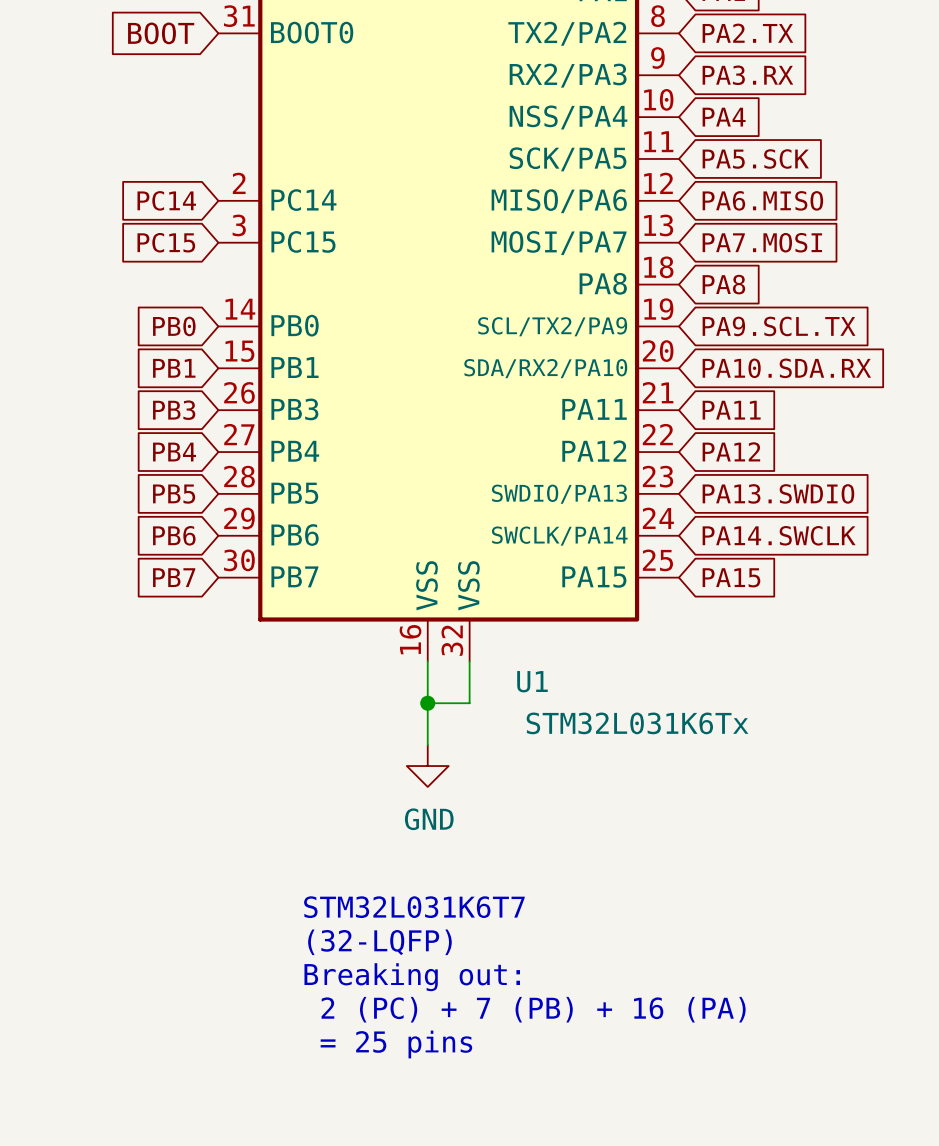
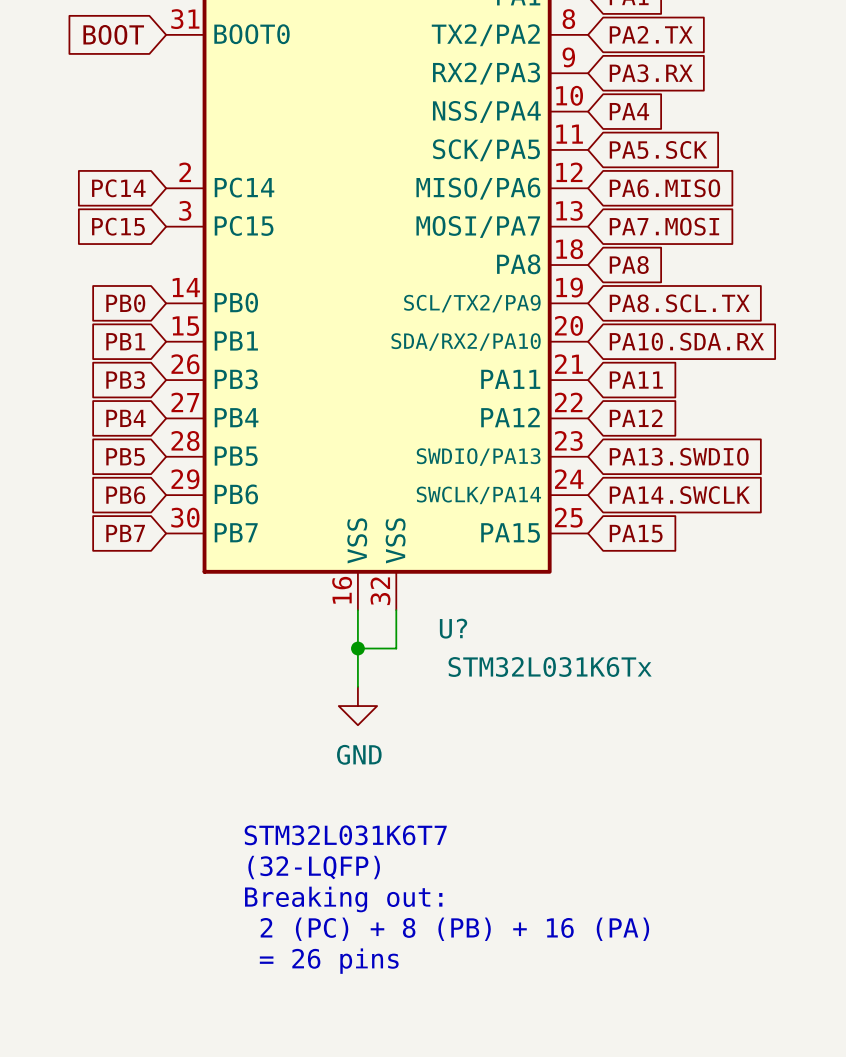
global label: PA9.SCL.TX (779, 326) -> PA8.SCL.TX (679, 303)
U1 name: U1 (532, 681) -> U? (453, 628)
text: 2 (PC) + 7 (PB) + 16 (PA) (533, 1009) -> 2 (PC) + 8 (PB) + 16 (PA) (454, 929)
text: = 25 pins (396, 1044) -> = 26 pins (329, 961)

